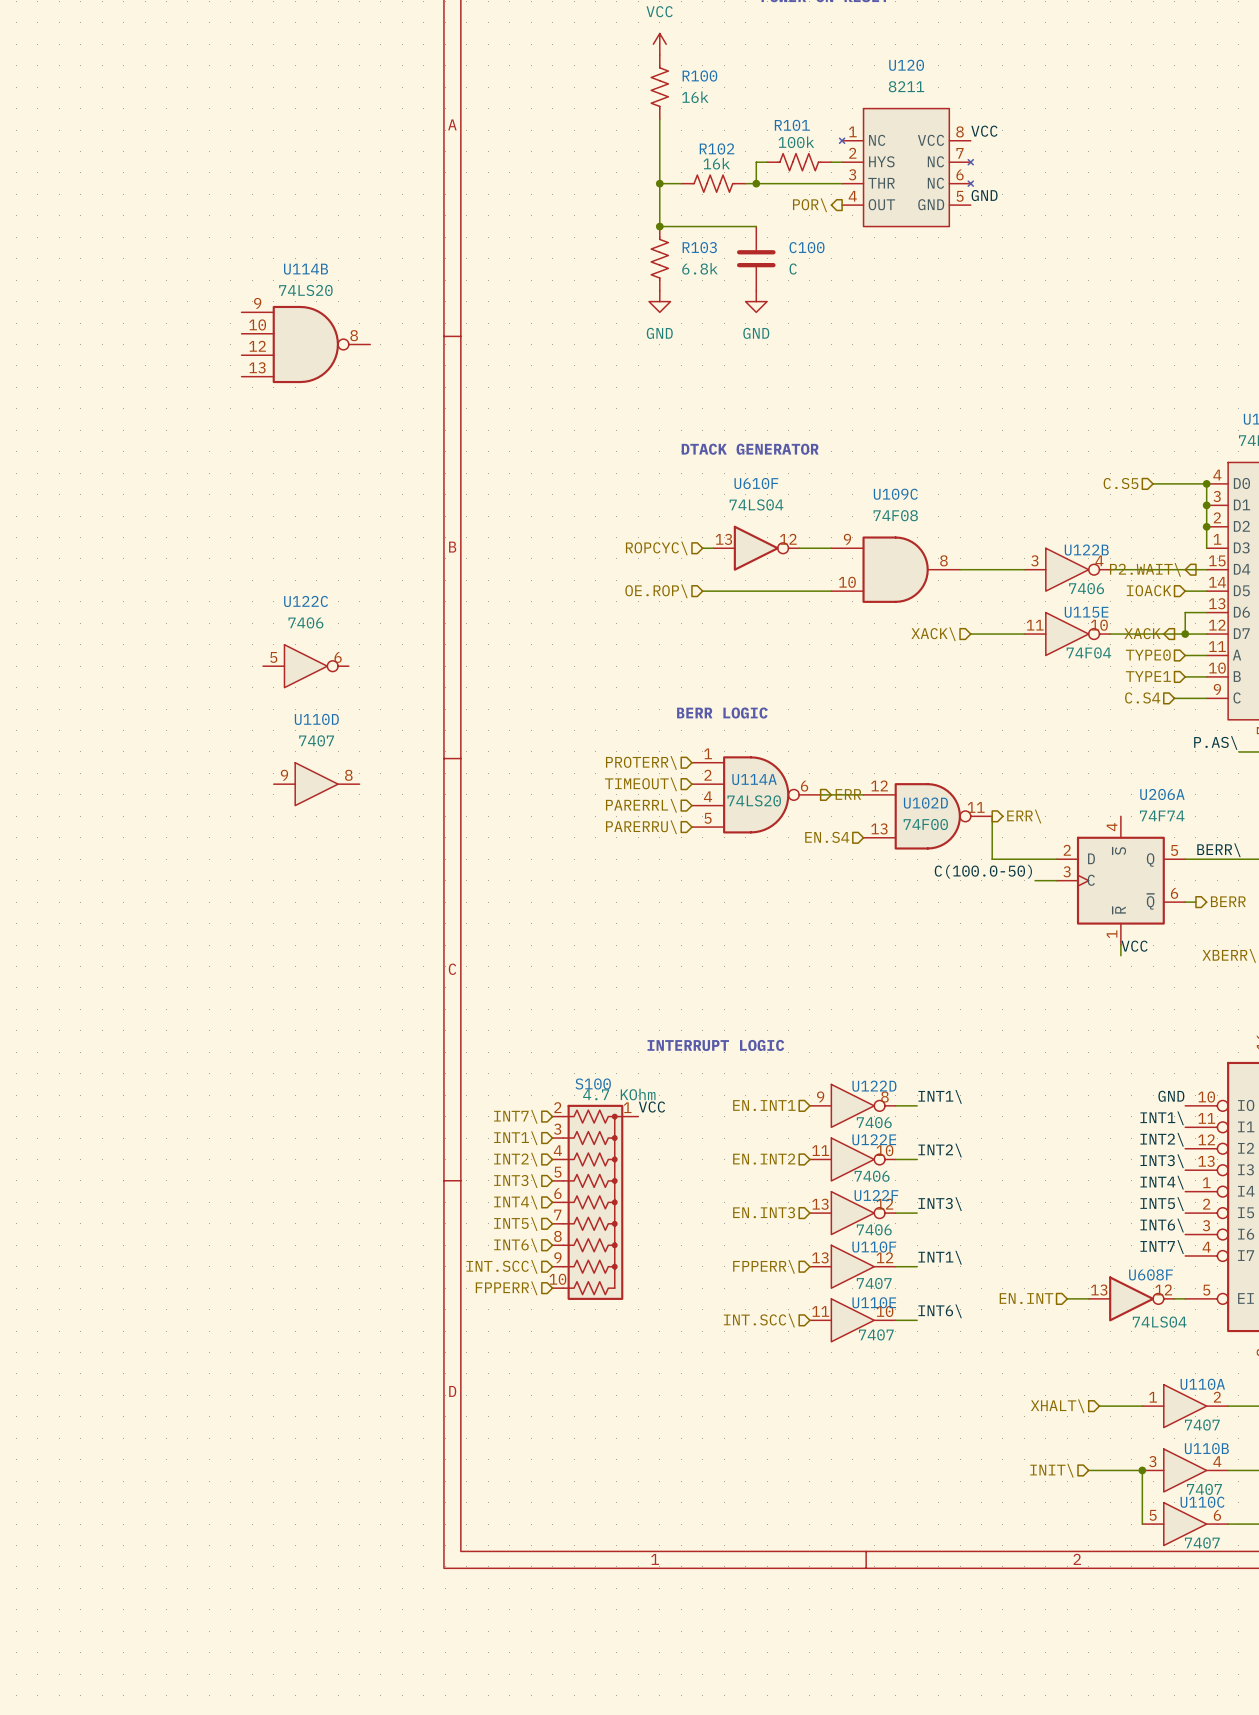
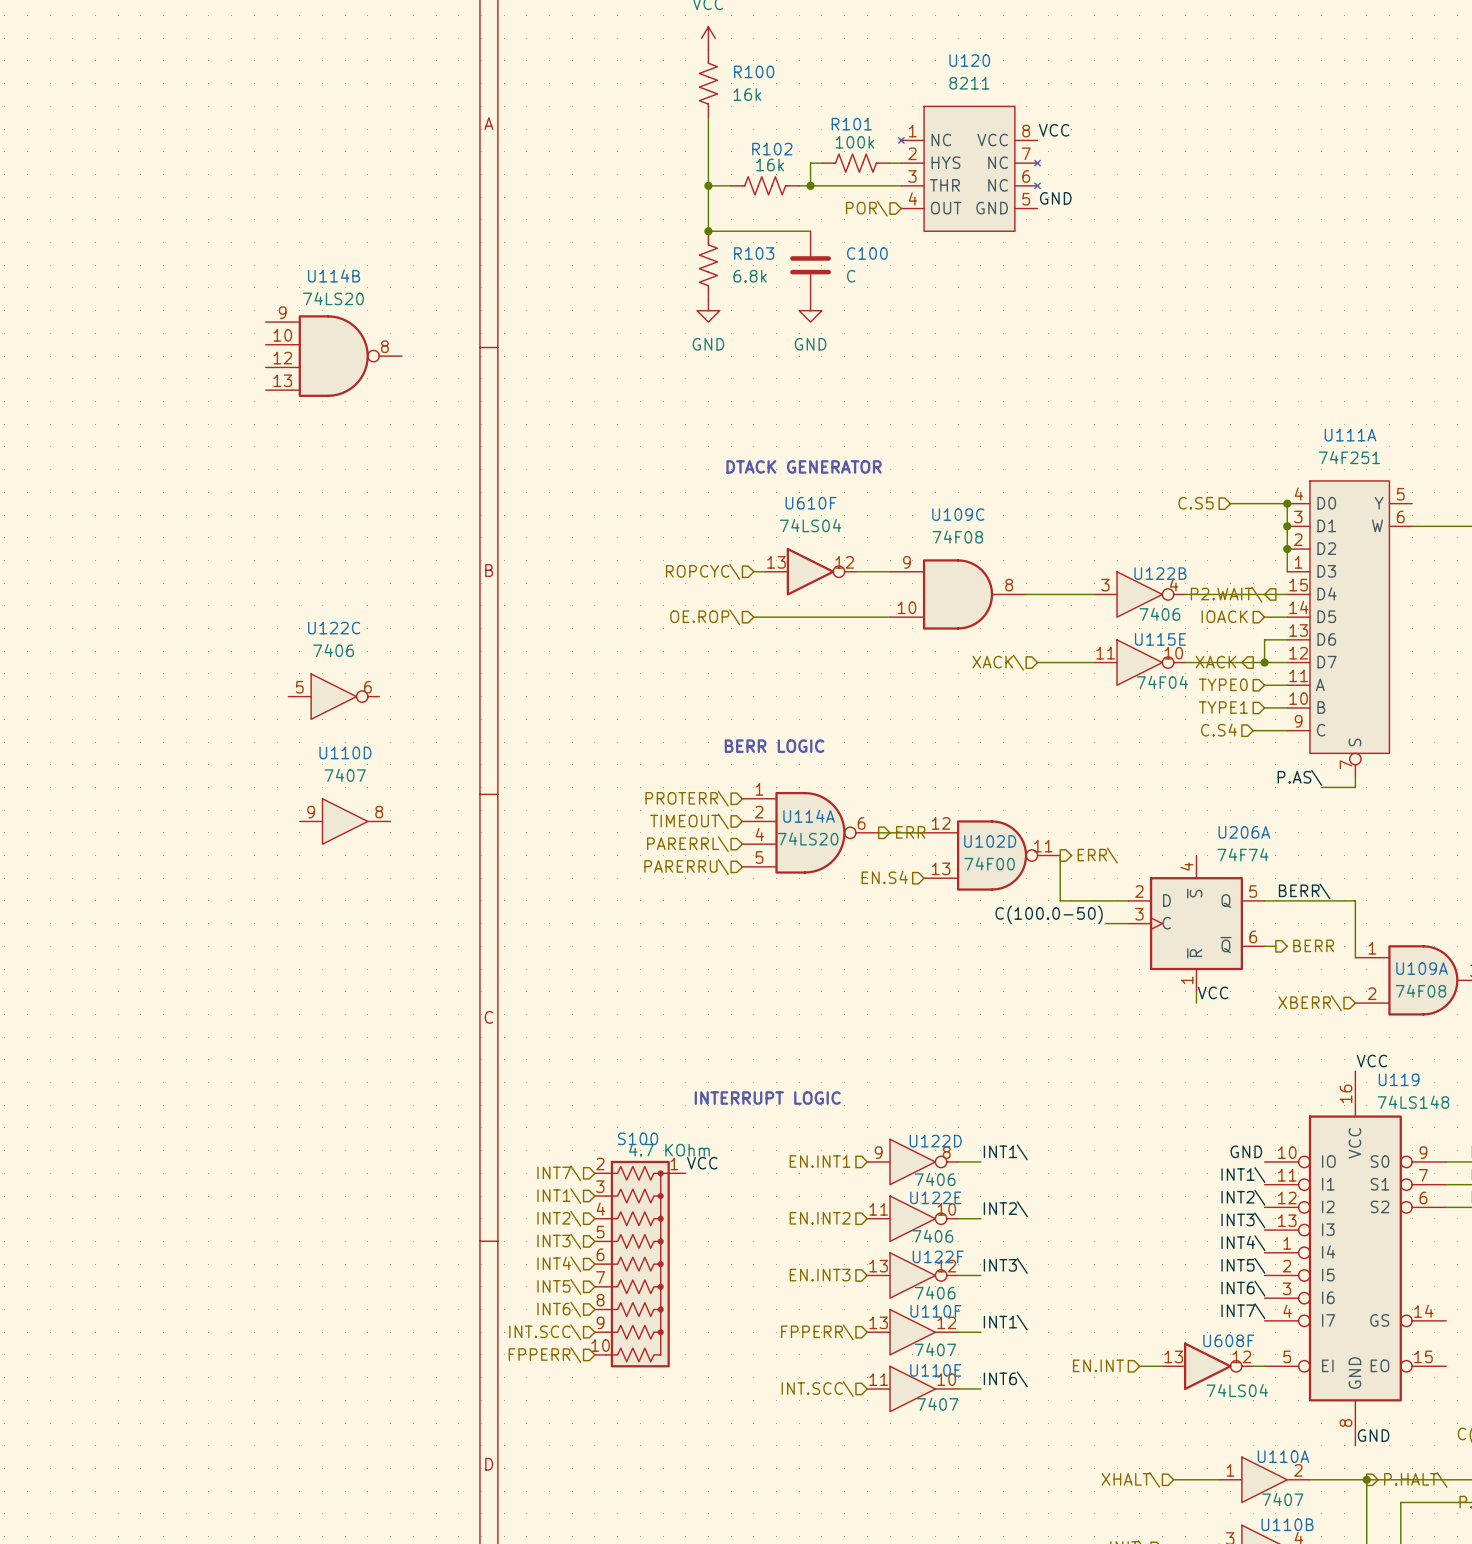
hierarchical label shape: output (810, 205) -> input (866, 208)

